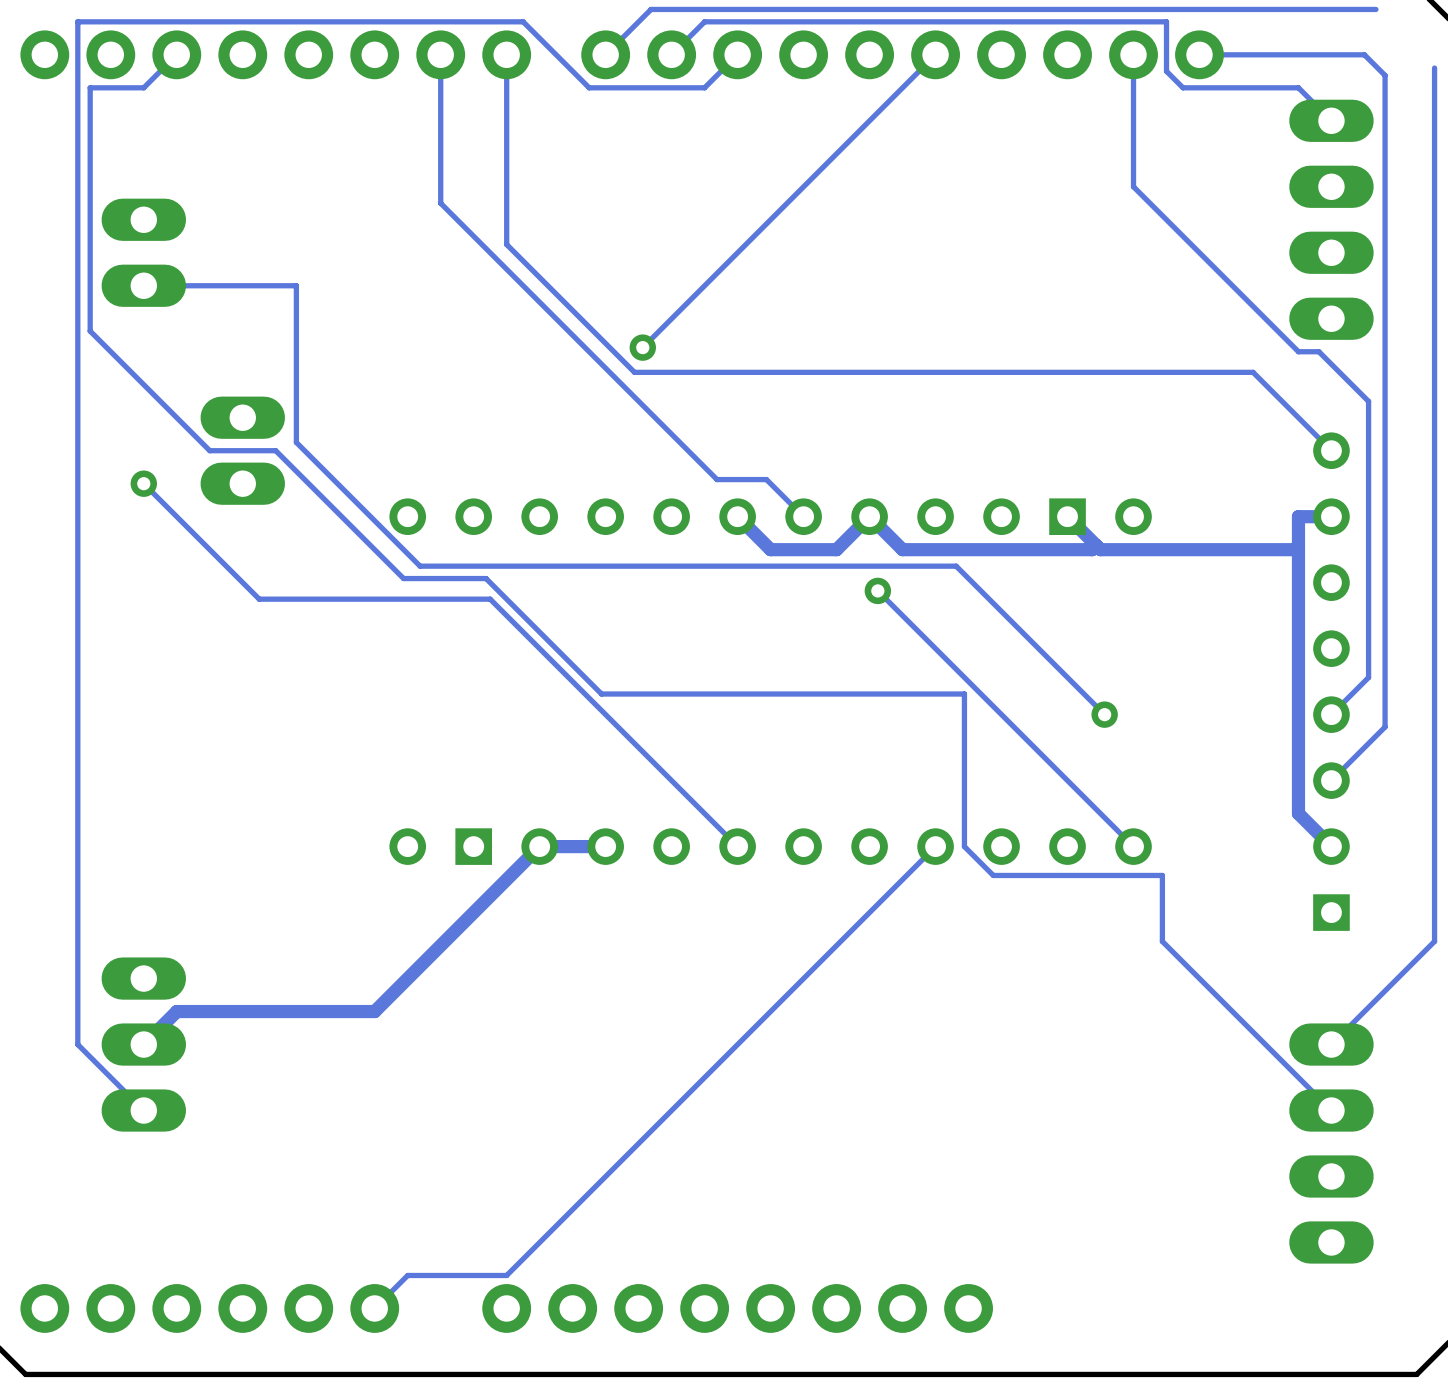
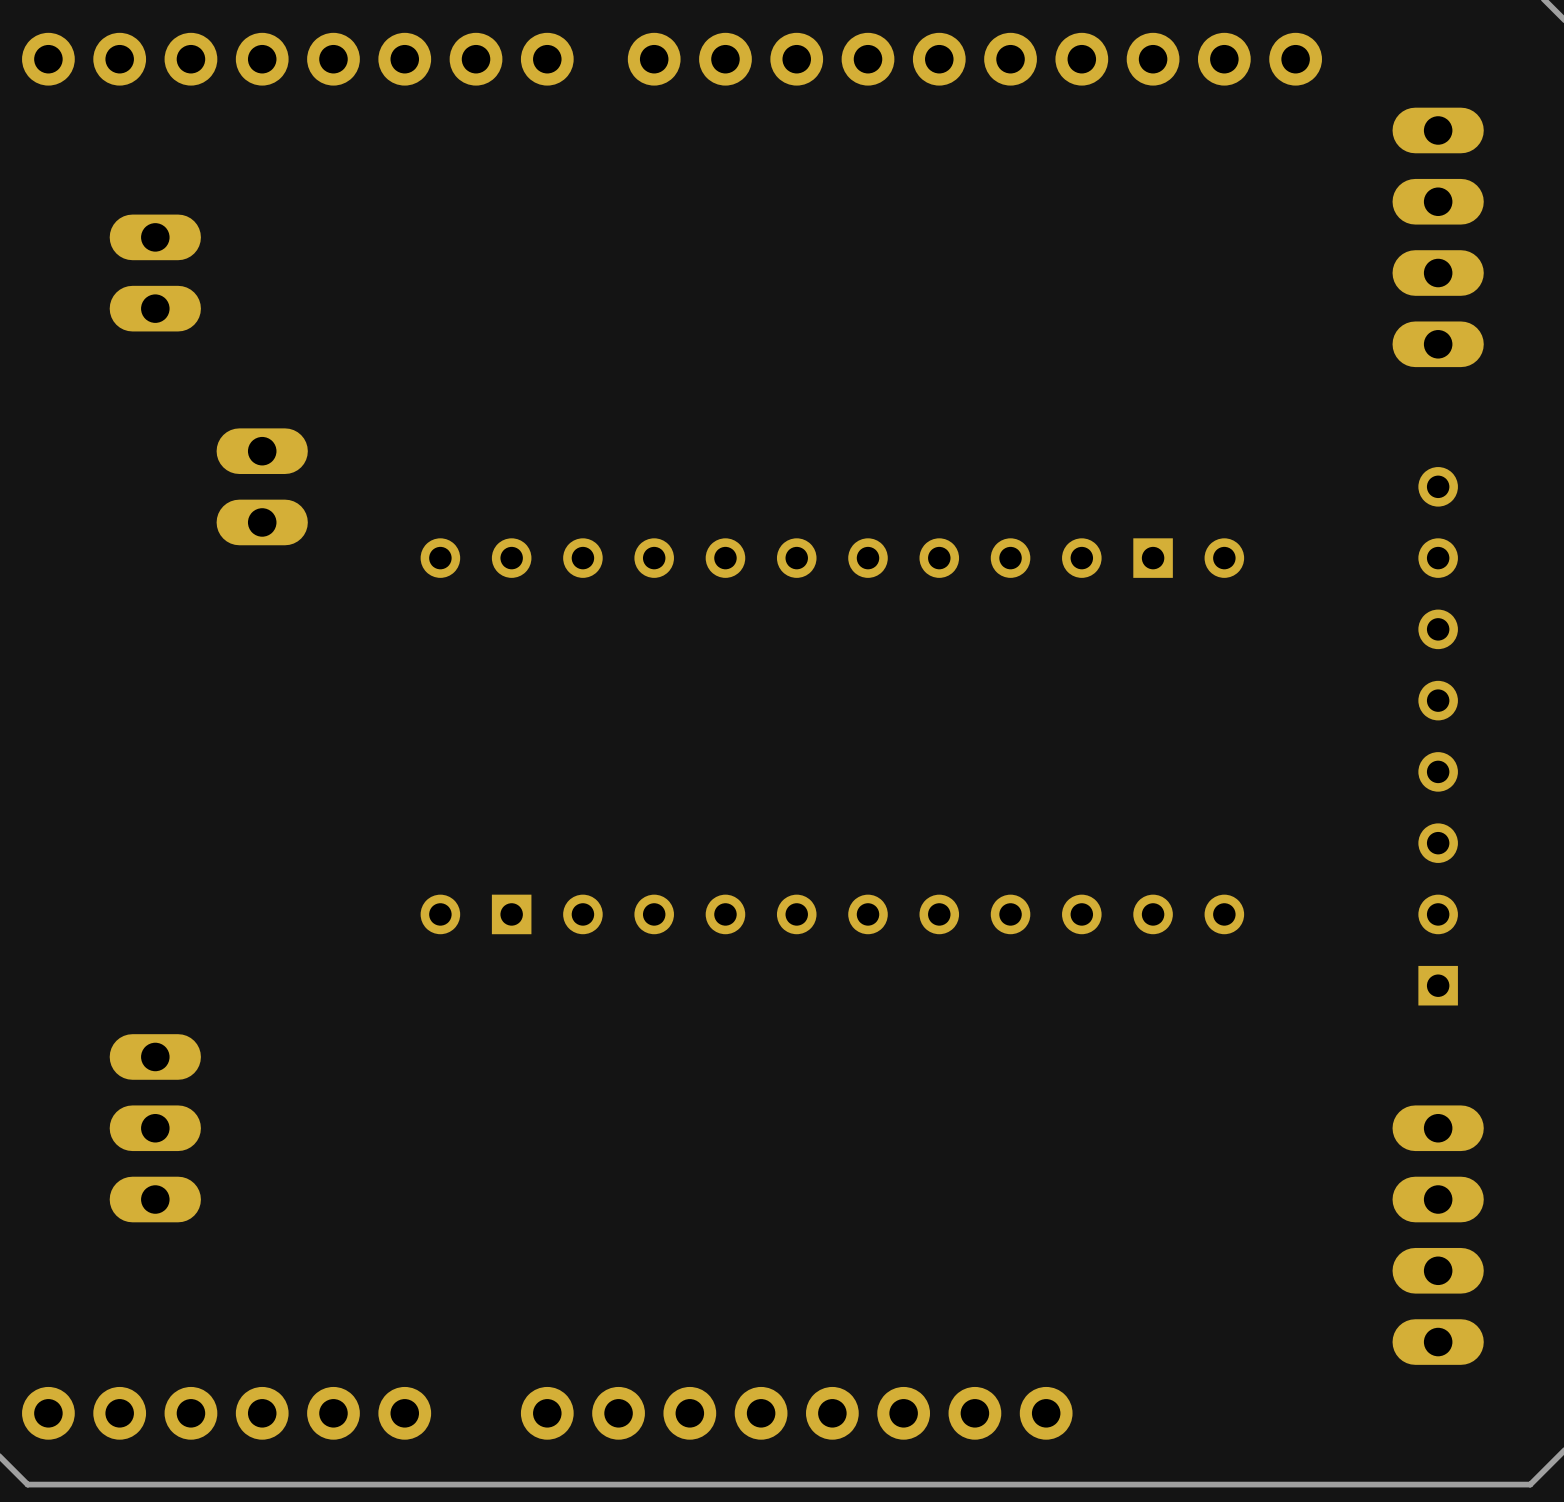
track: (1375, 9) (651, 9) (605, 54) -> none
track: (176, 54) (143, 87) (90, 87) (90, 331) (209, 450) (275, 450) (403, 578) (486, 578) (601, 694) (964, 694) (964, 846) (993, 875) (1162, 875) (1162, 941) (1331, 1110) -> none
track: (440, 54) (440, 203) (717, 479) (766, 479) (803, 516) -> none
track: (506, 54) (506, 244) (634, 372) (1253, 372) (1331, 450) -> none
track: (671, 54) (704, 21) (1166, 21) (1166, 71) (1183, 87) (1298, 87) (1331, 120) -> none
track: (737, 54) (704, 87) (589, 87) (523, 21) (77, 21) (77, 1044) (143, 1110) -> none
track: (935, 54) (642, 347) -> none
track: (1133, 54) (1133, 186) (1298, 351) (1318, 351) (1368, 401) (1368, 677) (1331, 714) -> none
track: (1199, 54) (1364, 54) (1385, 75) (1385, 727) (1331, 780) -> none
track: (1434, 68) (1434, 941) (1331, 1044) -> none
track: (143, 285) (296, 285) (296, 442) (420, 566) (956, 566) (1104, 714) -> none
via: (642, 347) -> none
track: (143, 483) (259, 599) (490, 599) (737, 846) -> none
via: (143, 483) -> none
track: (737, 516) (770, 549) (836, 549) (869, 516) (902, 549) (1092, 549) (1096, 545) -> none
track: (1067, 516) (1100, 549) (1298, 549) -> none
track: (1331, 516) (1298, 516) (1298, 813) (1331, 846) -> none
track: (877, 590) (1133, 846) -> none
via: (877, 590) -> none
via: (1104, 714) -> none
track: (605, 846) (539, 846) (374, 1011) (176, 1011) (143, 1044) -> none
track: (935, 846) (506, 1275) (407, 1275) (374, 1308) -> none

